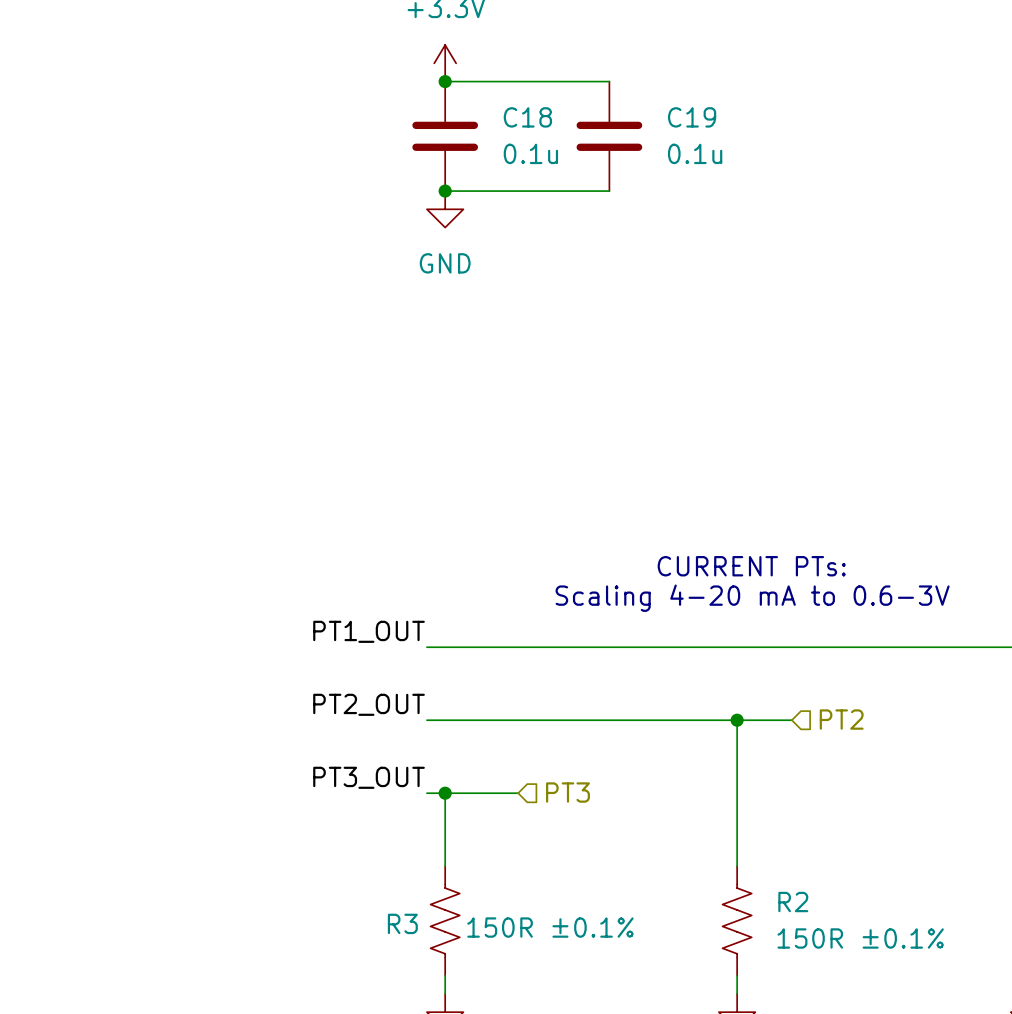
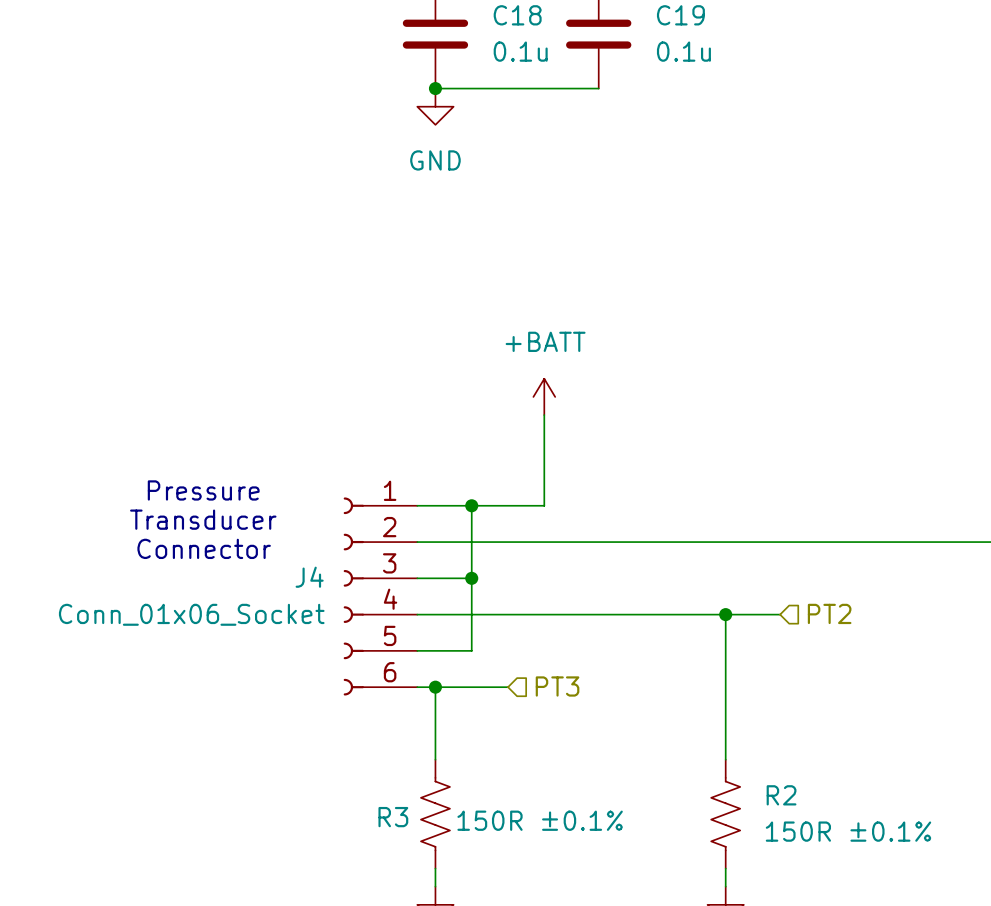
power symbol: none -> +BATT (544, 396)
wire: none -> (544, 415) (544, 505) (417, 505)
text: CURRENT PTs: (751, 566) -> none
text: none -> Pressure (203, 490)
text: Scaling 4-20 mA to 0.6-3V (752, 598) -> none
wire: none -> (471, 505) (471, 650) (417, 650)
junction: none -> (471, 505)
text: none -> Transducer (203, 519)
label: PT1_OUT (369, 631) -> none
text: none -> Connector (204, 548)
wire: none -> (417, 578) (471, 578)
junction: none -> (471, 578)
J4: none -> Conn_01x06_Socket (380, 596)
label: PT2_OUT (369, 704) -> none
label: PT3_OUT (369, 777) -> none

